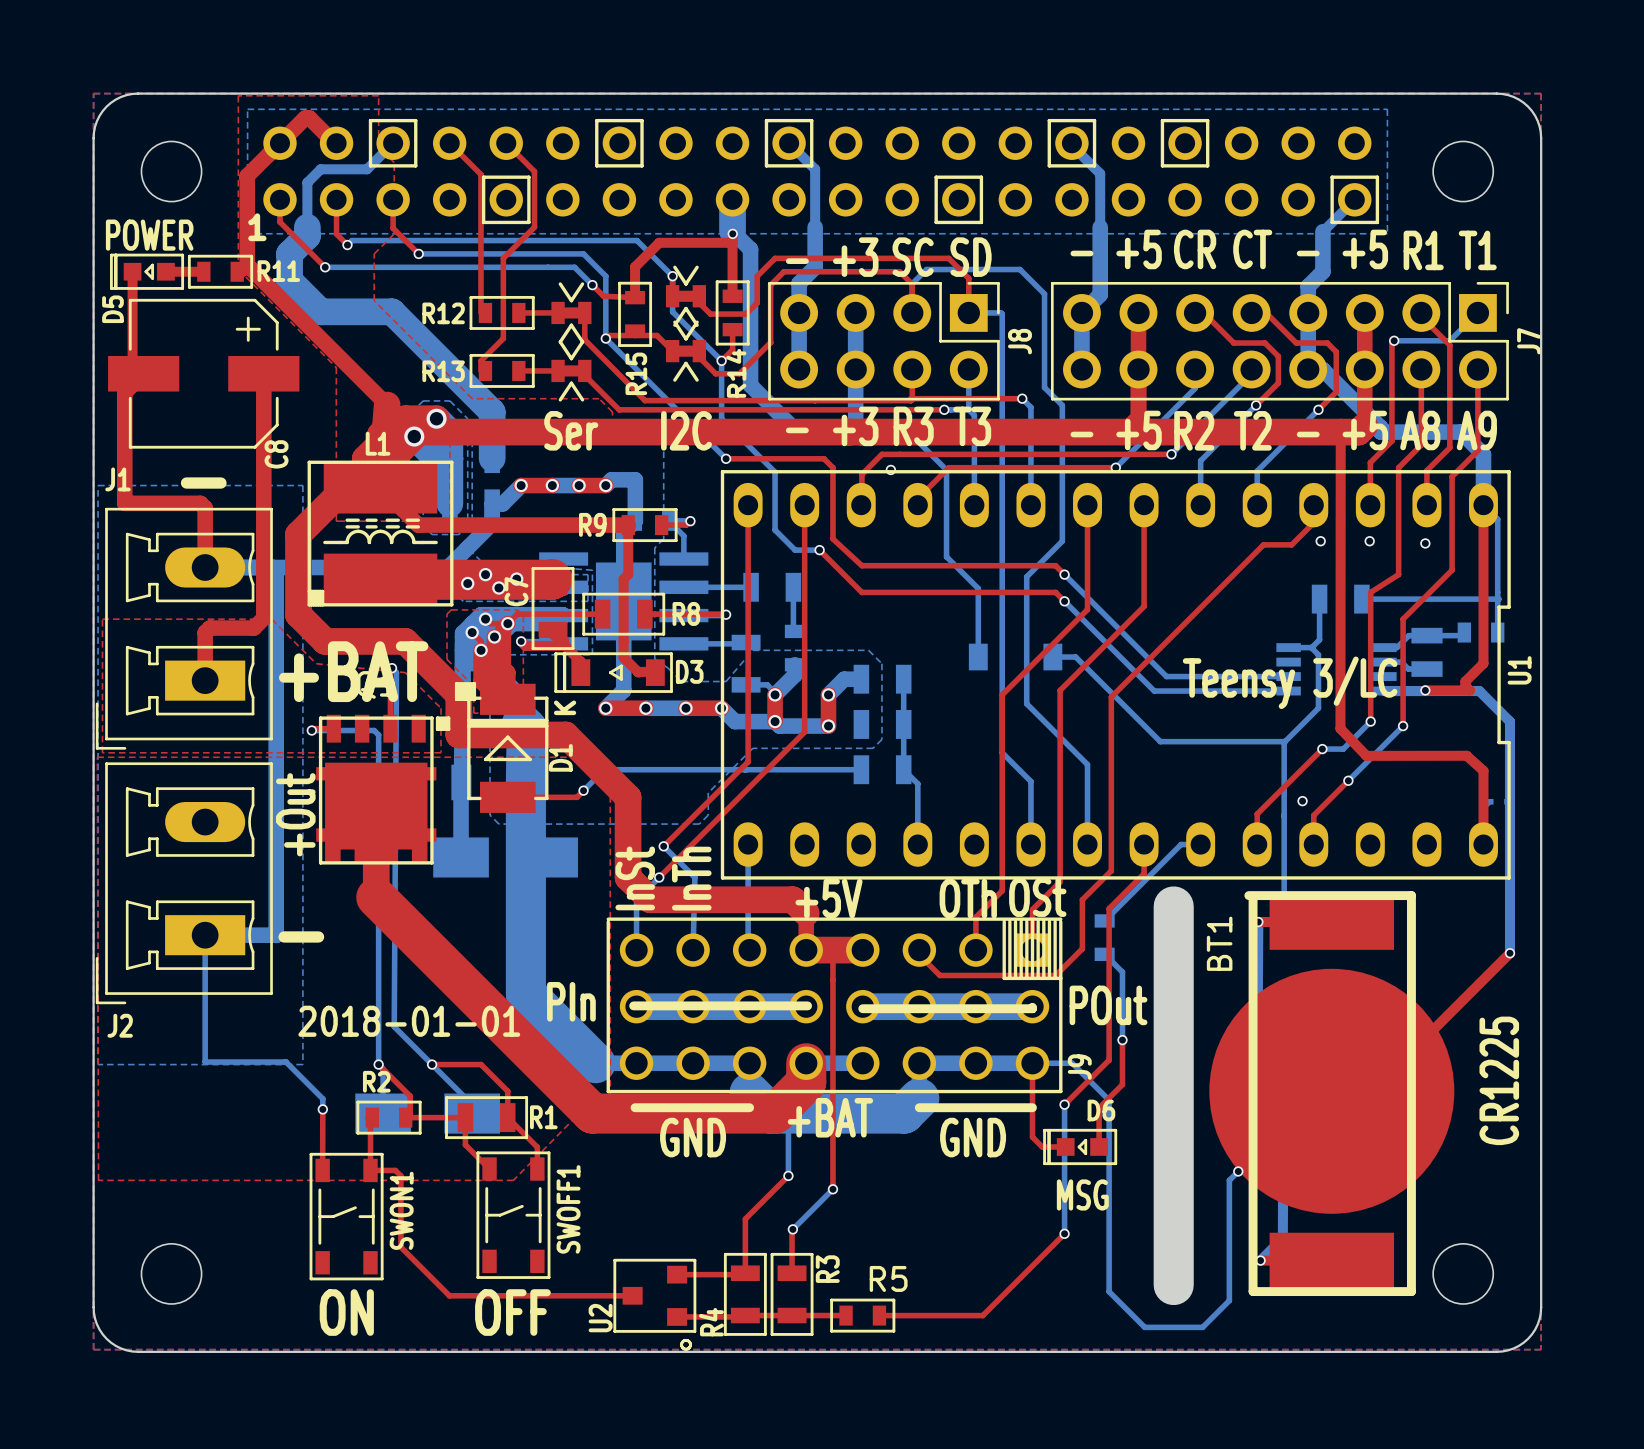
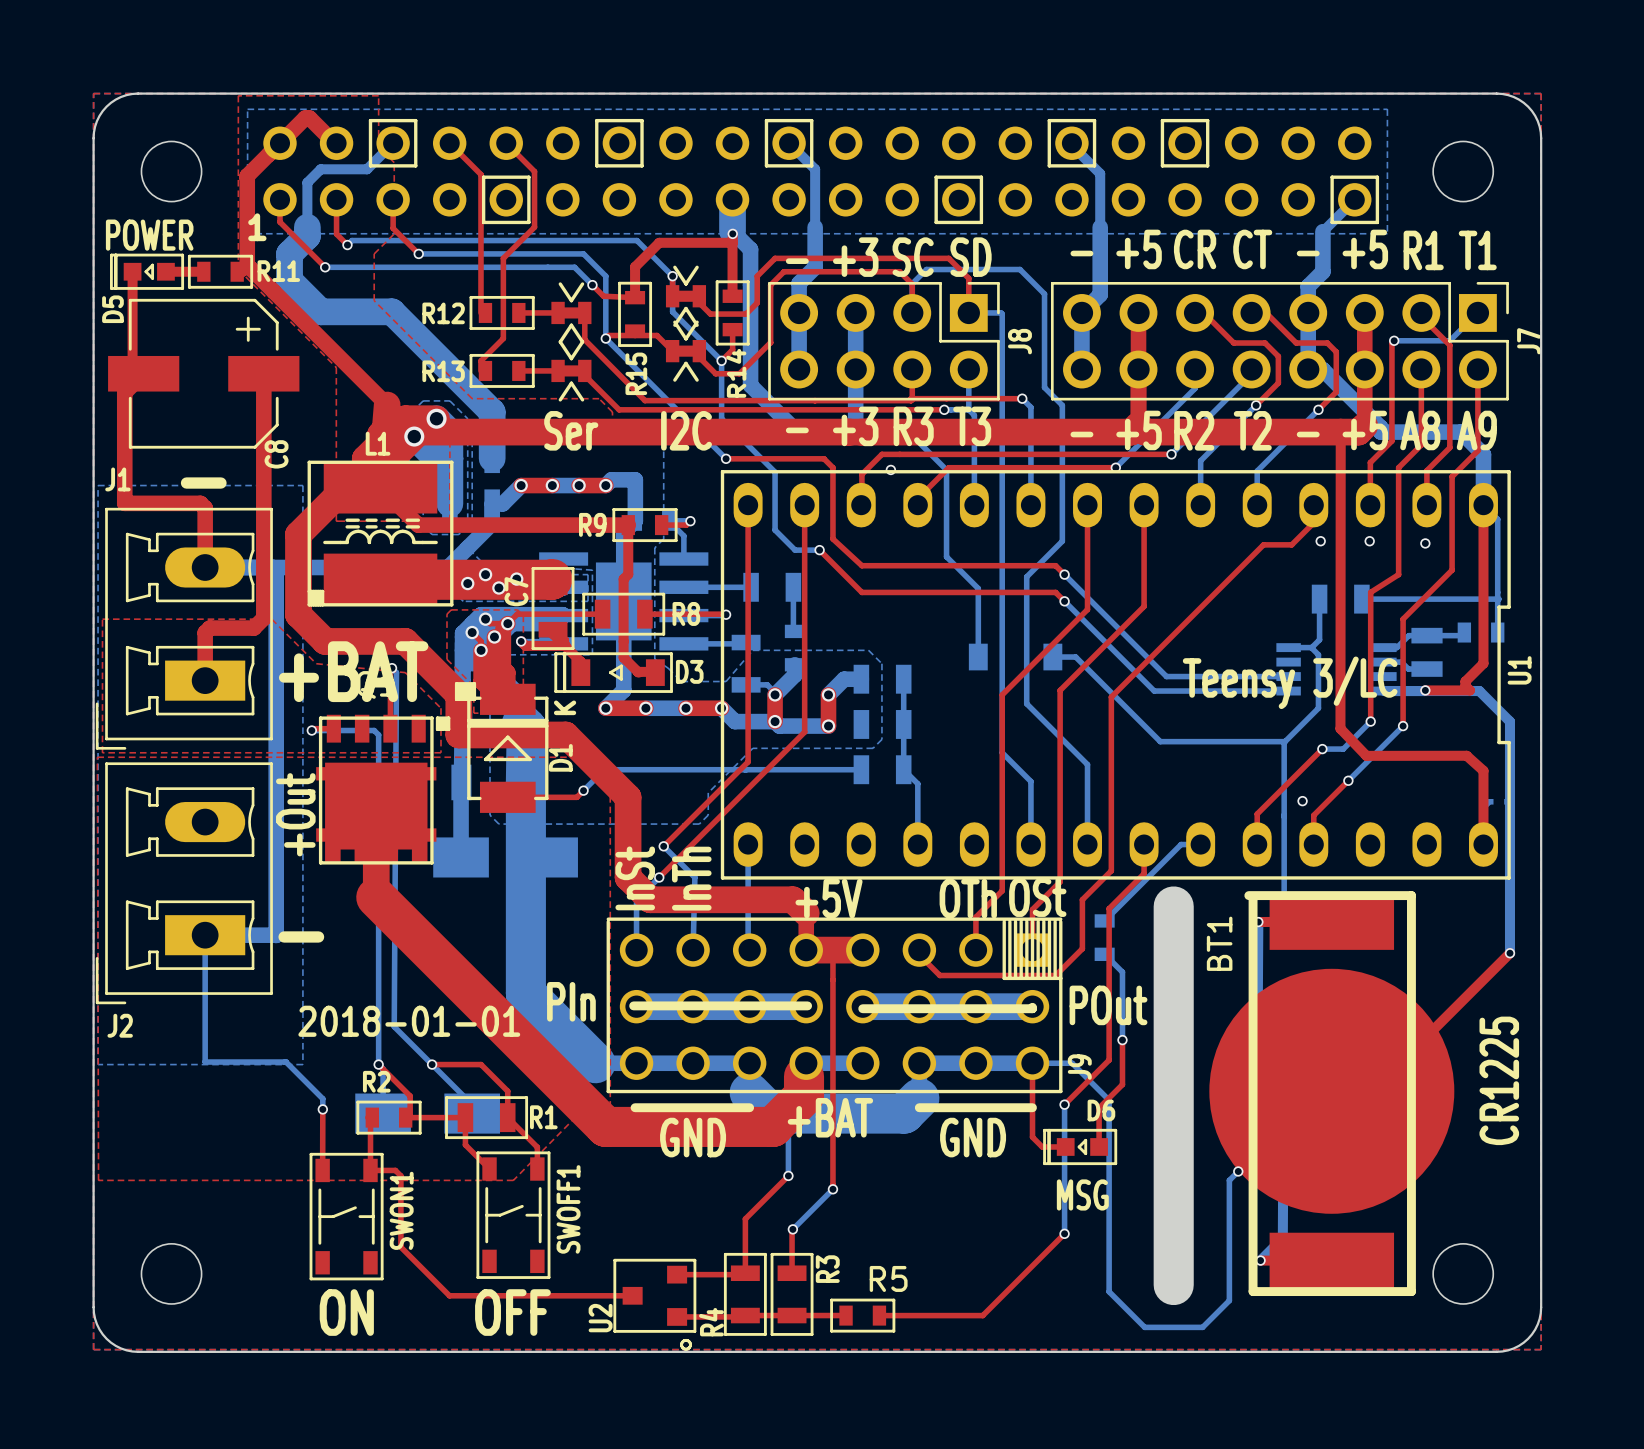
top track: (806, 1063) (806, 1082) (775, 1113) (592, 1113) -> (804, 1076) (804, 1095) (772, 1126) (605, 1126) (592, 1113)

